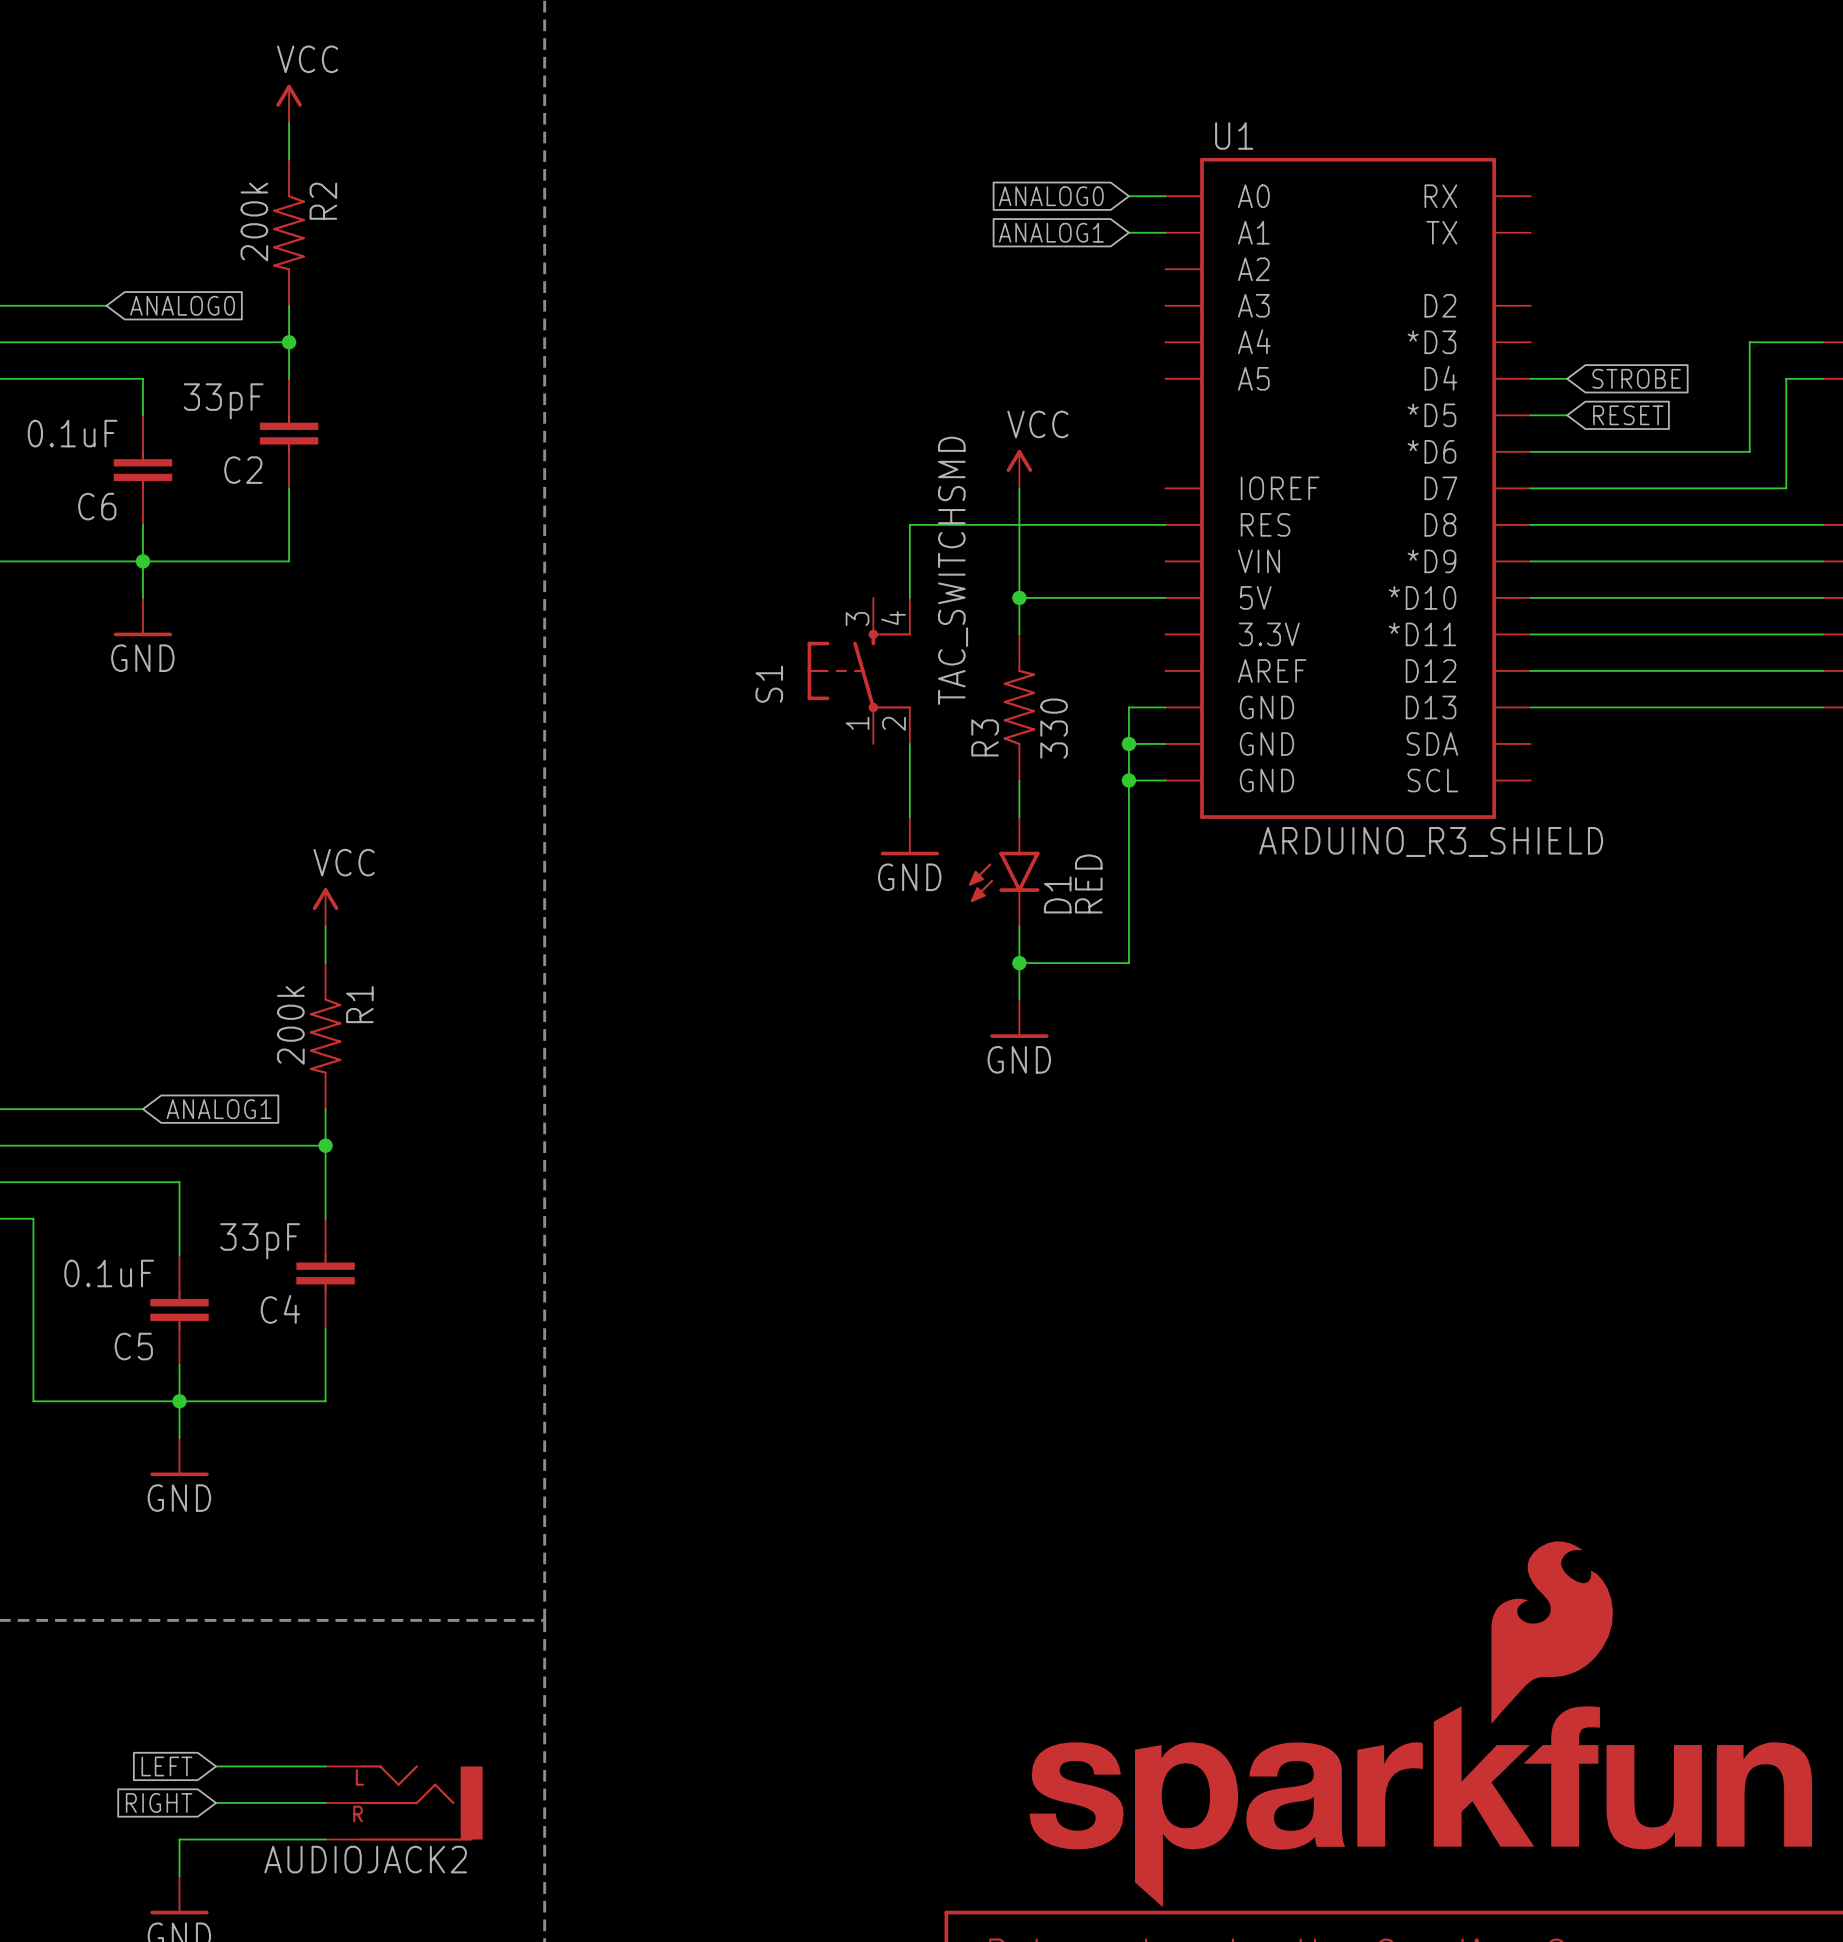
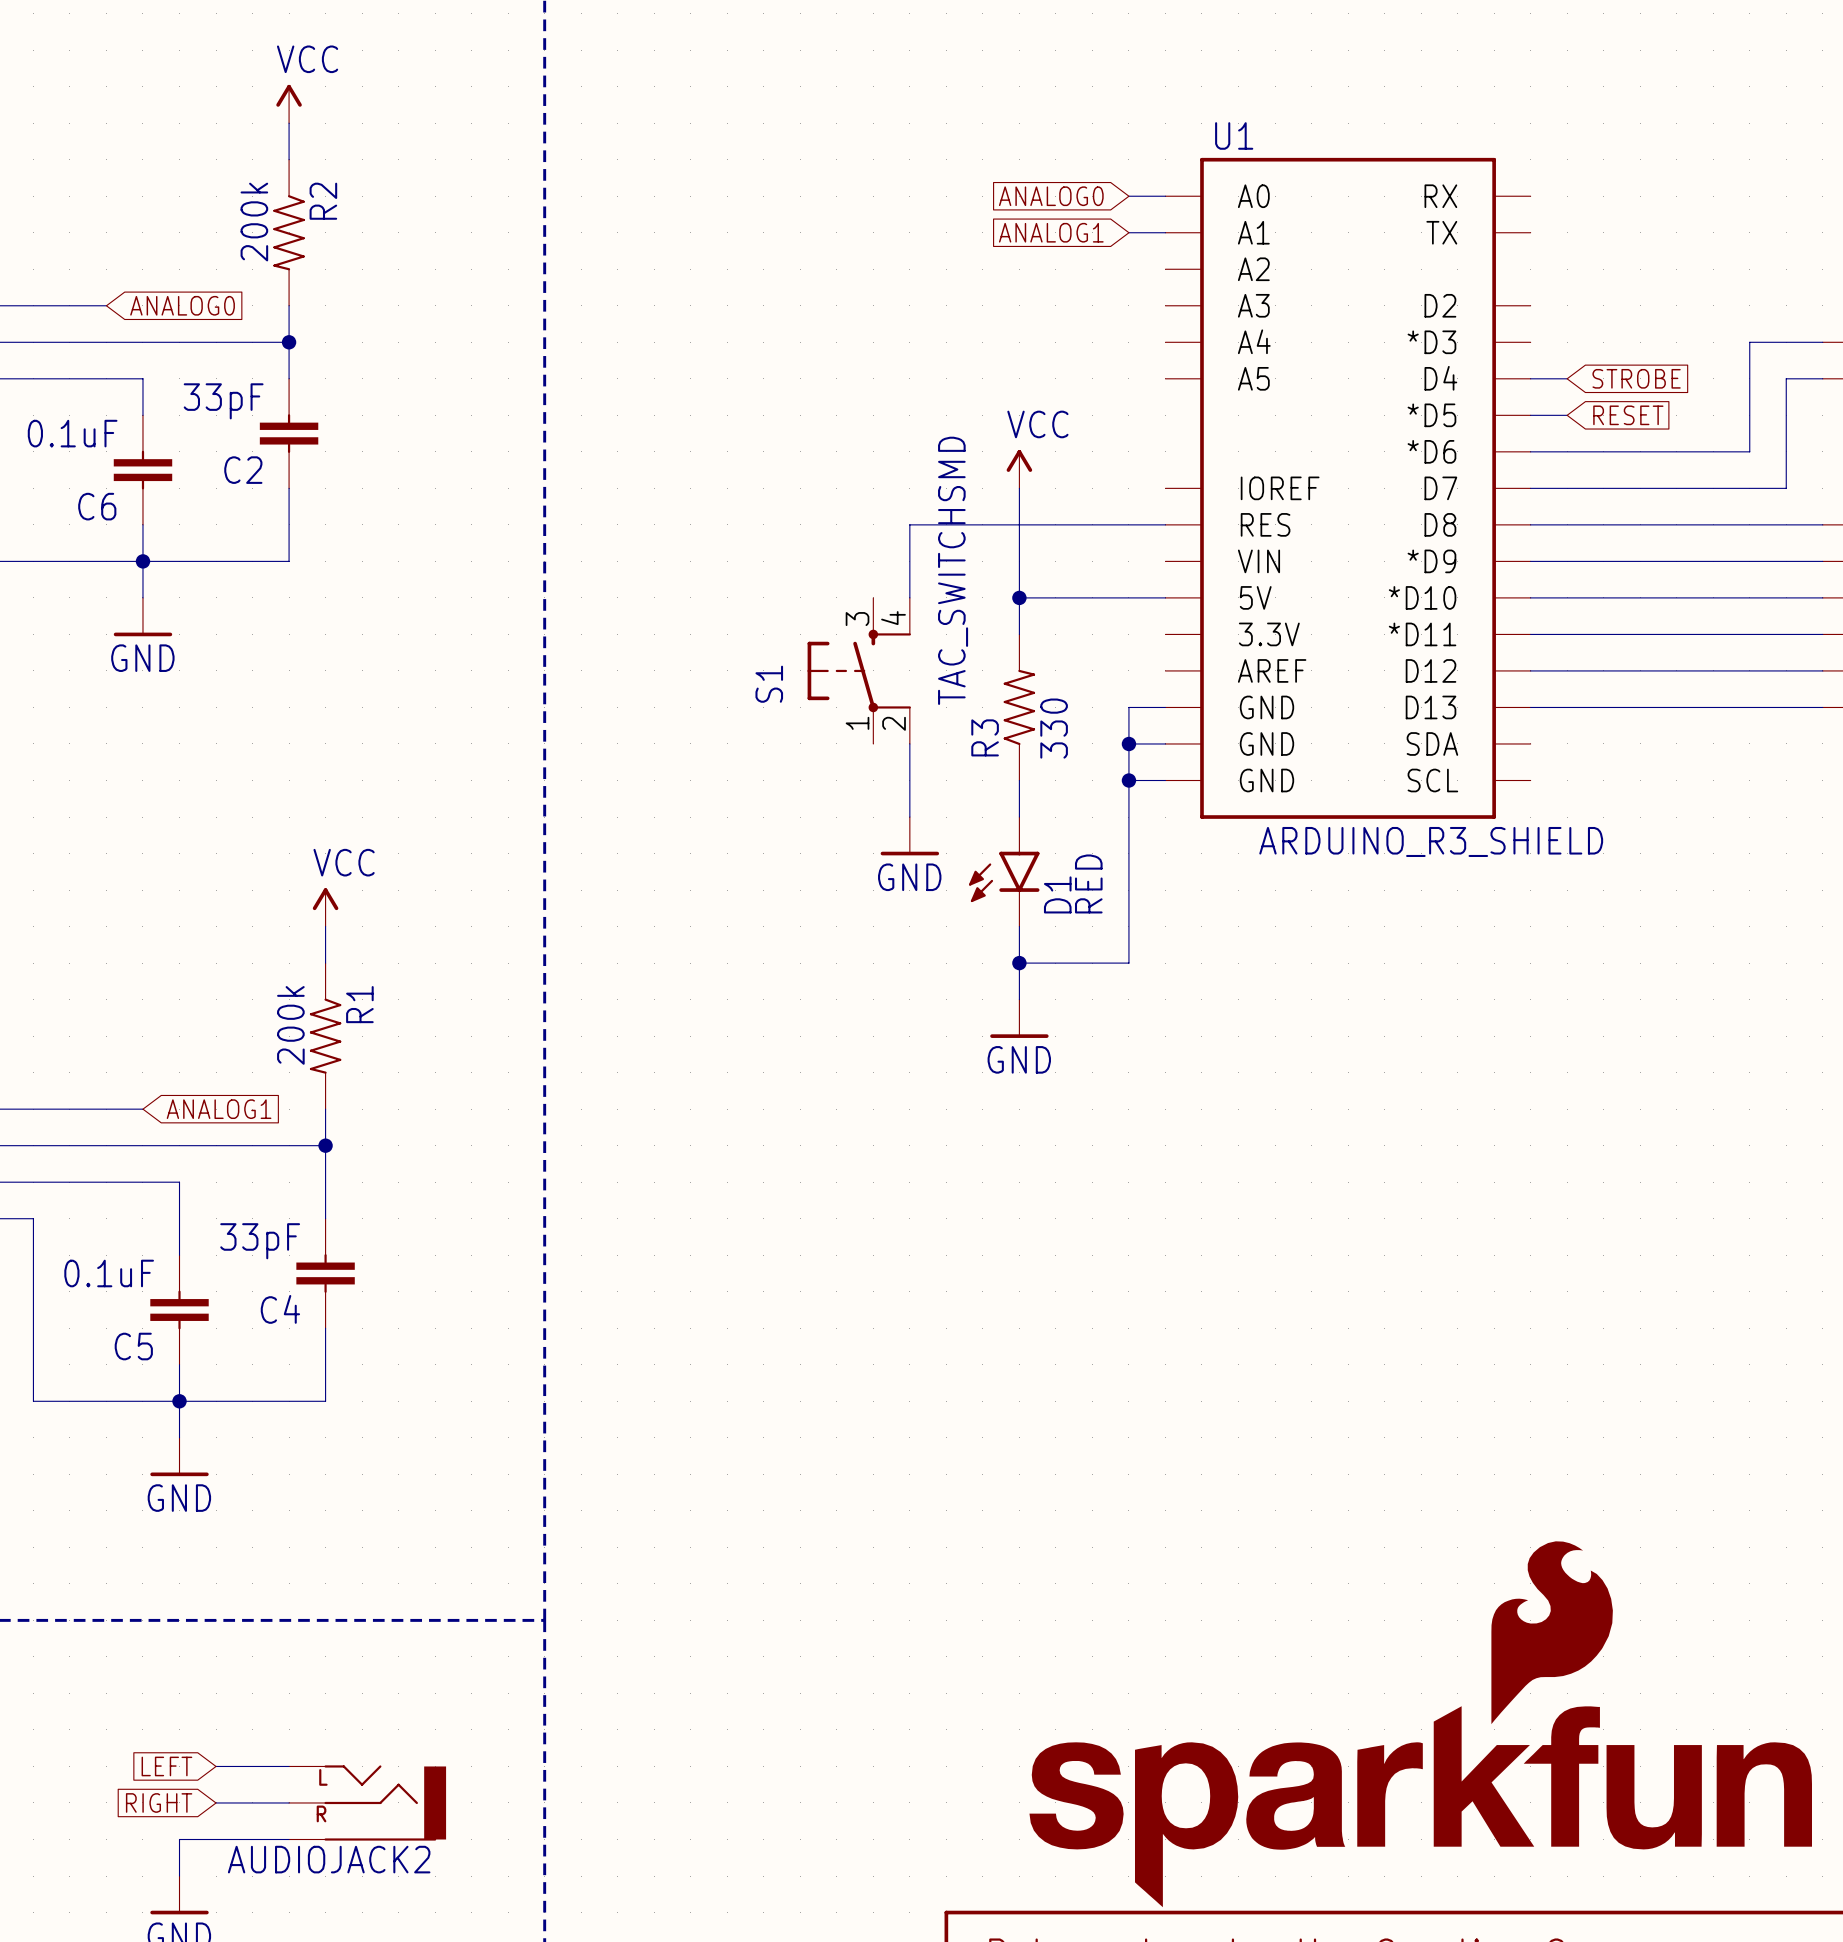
AUDIOJACK2 position: (404, 1802) -> (367, 1802)

